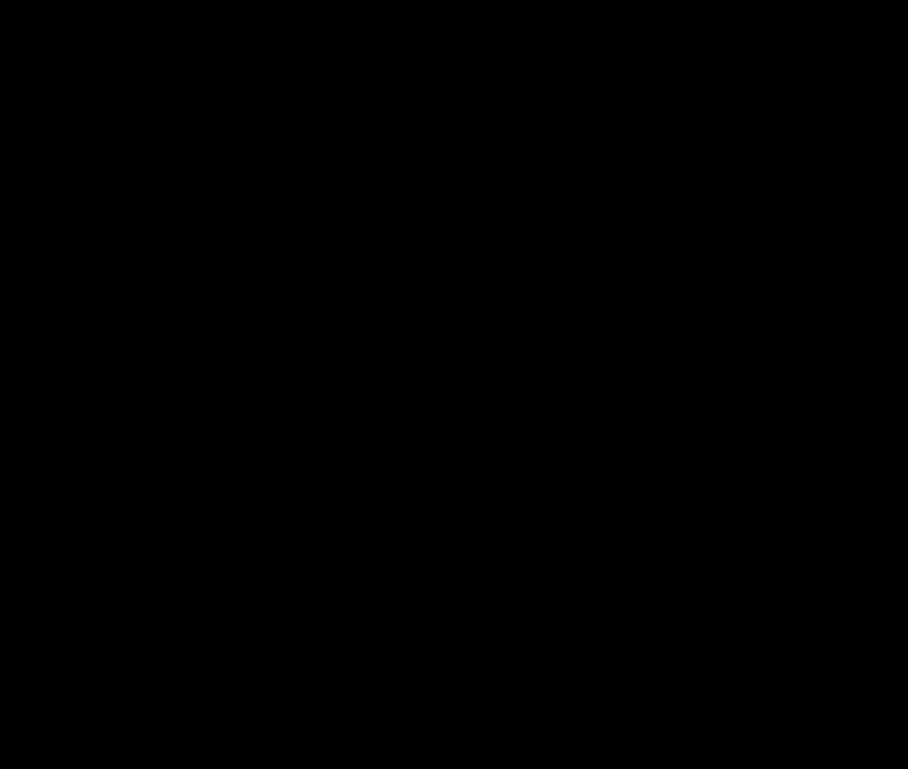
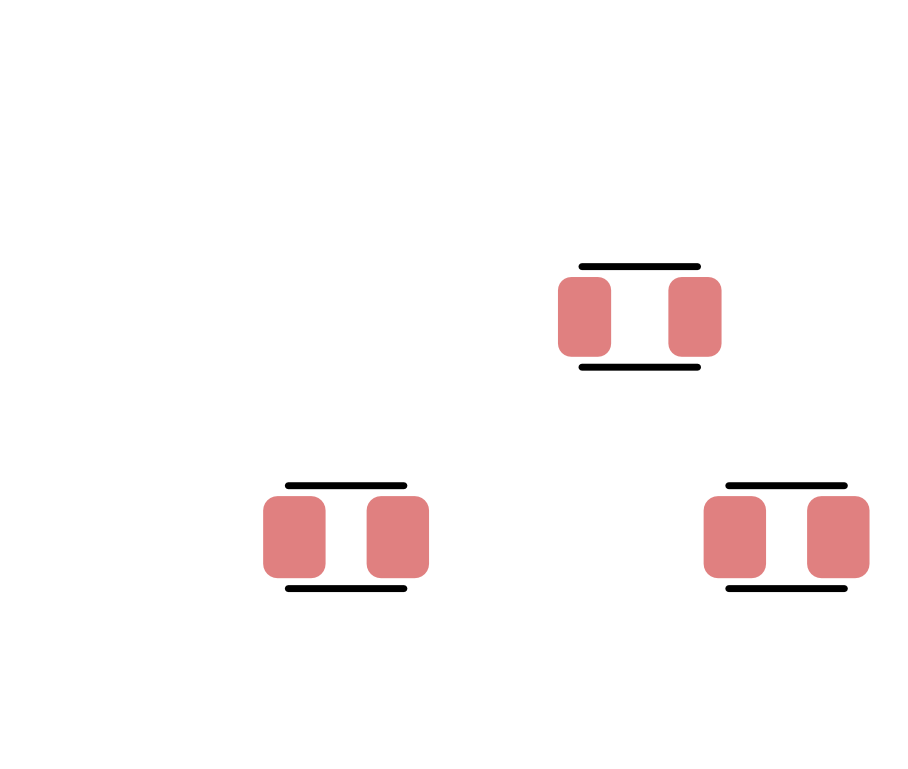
part: none -> (639, 316)
part: none -> (346, 537)
part: none -> (786, 537)

